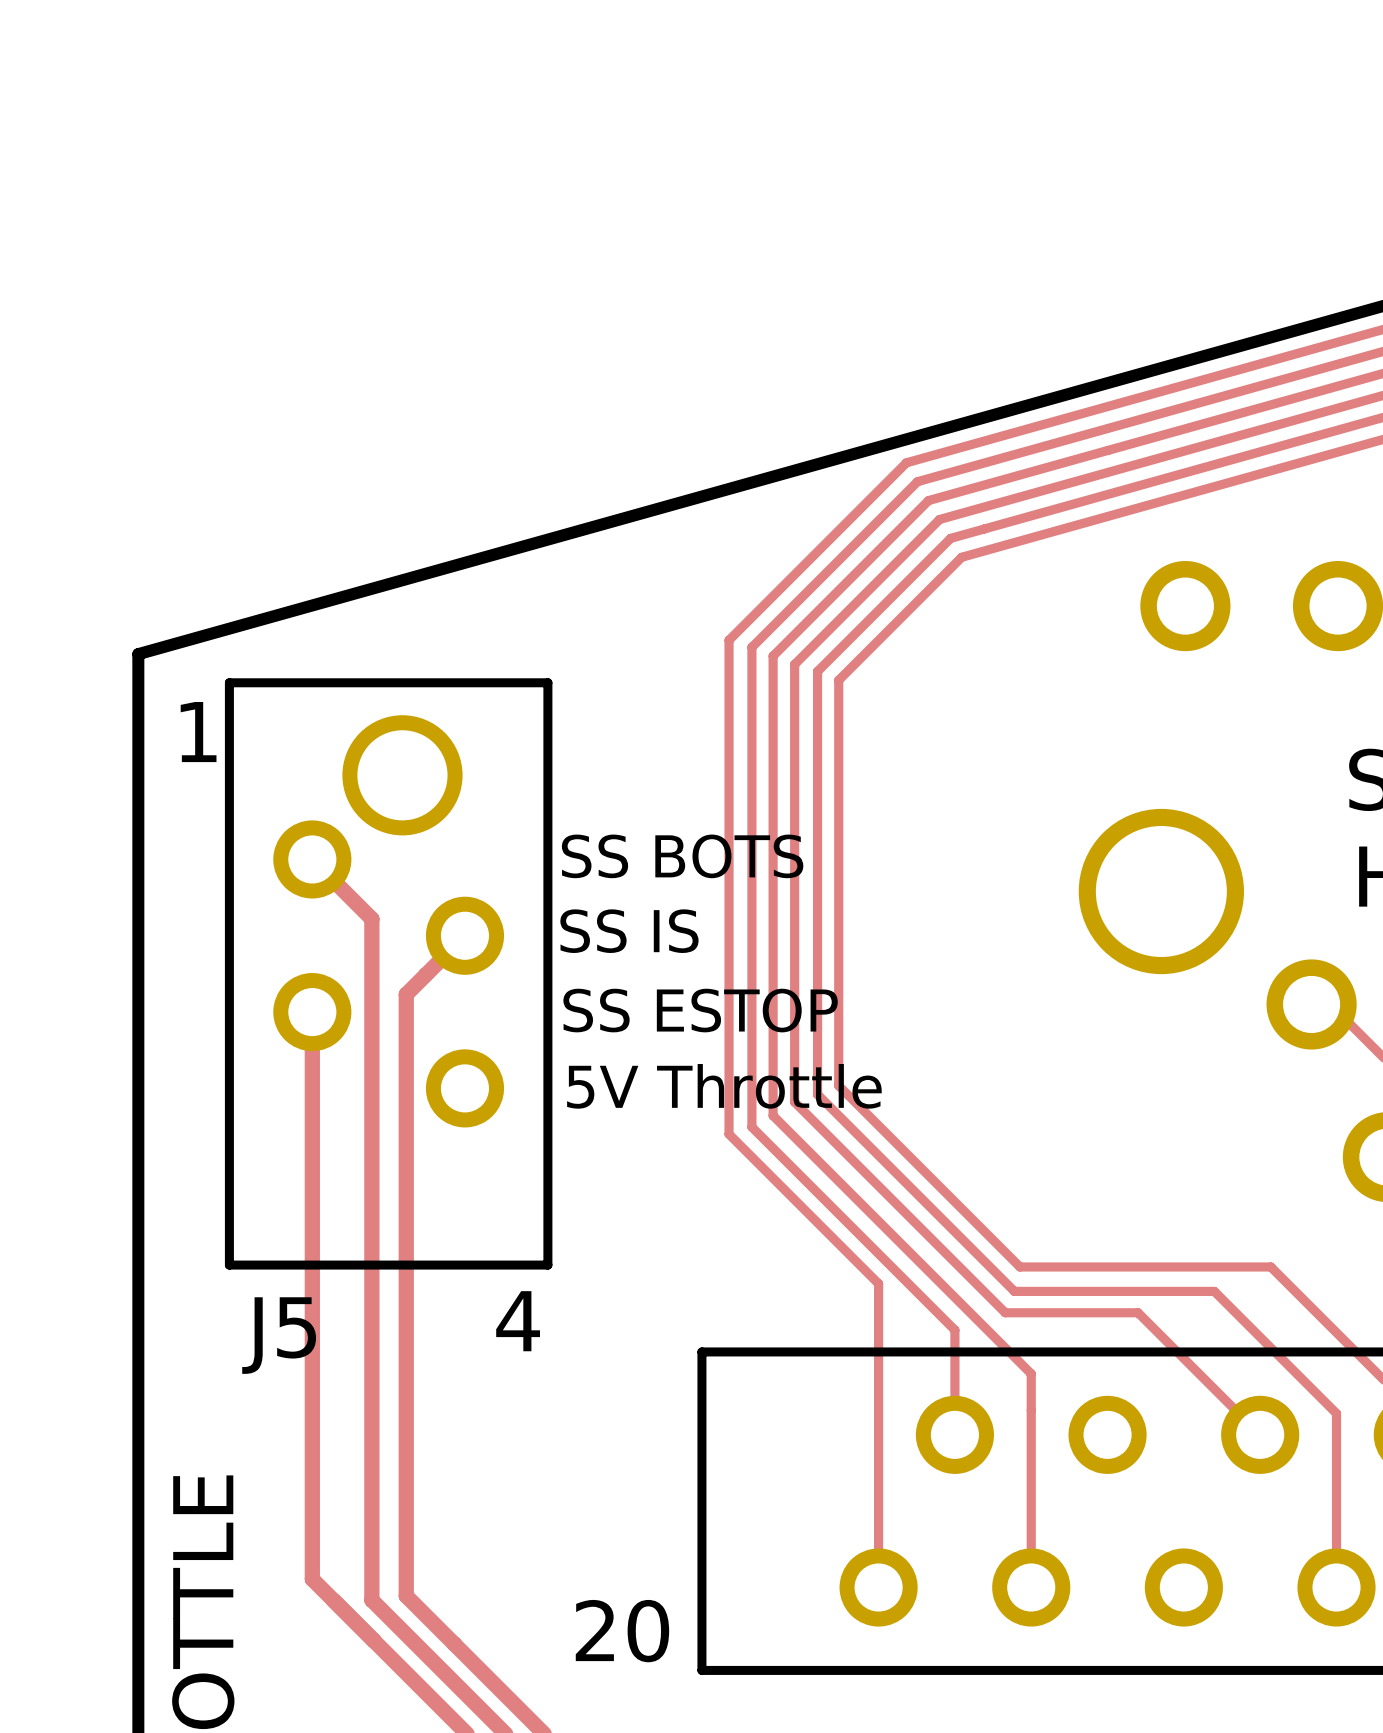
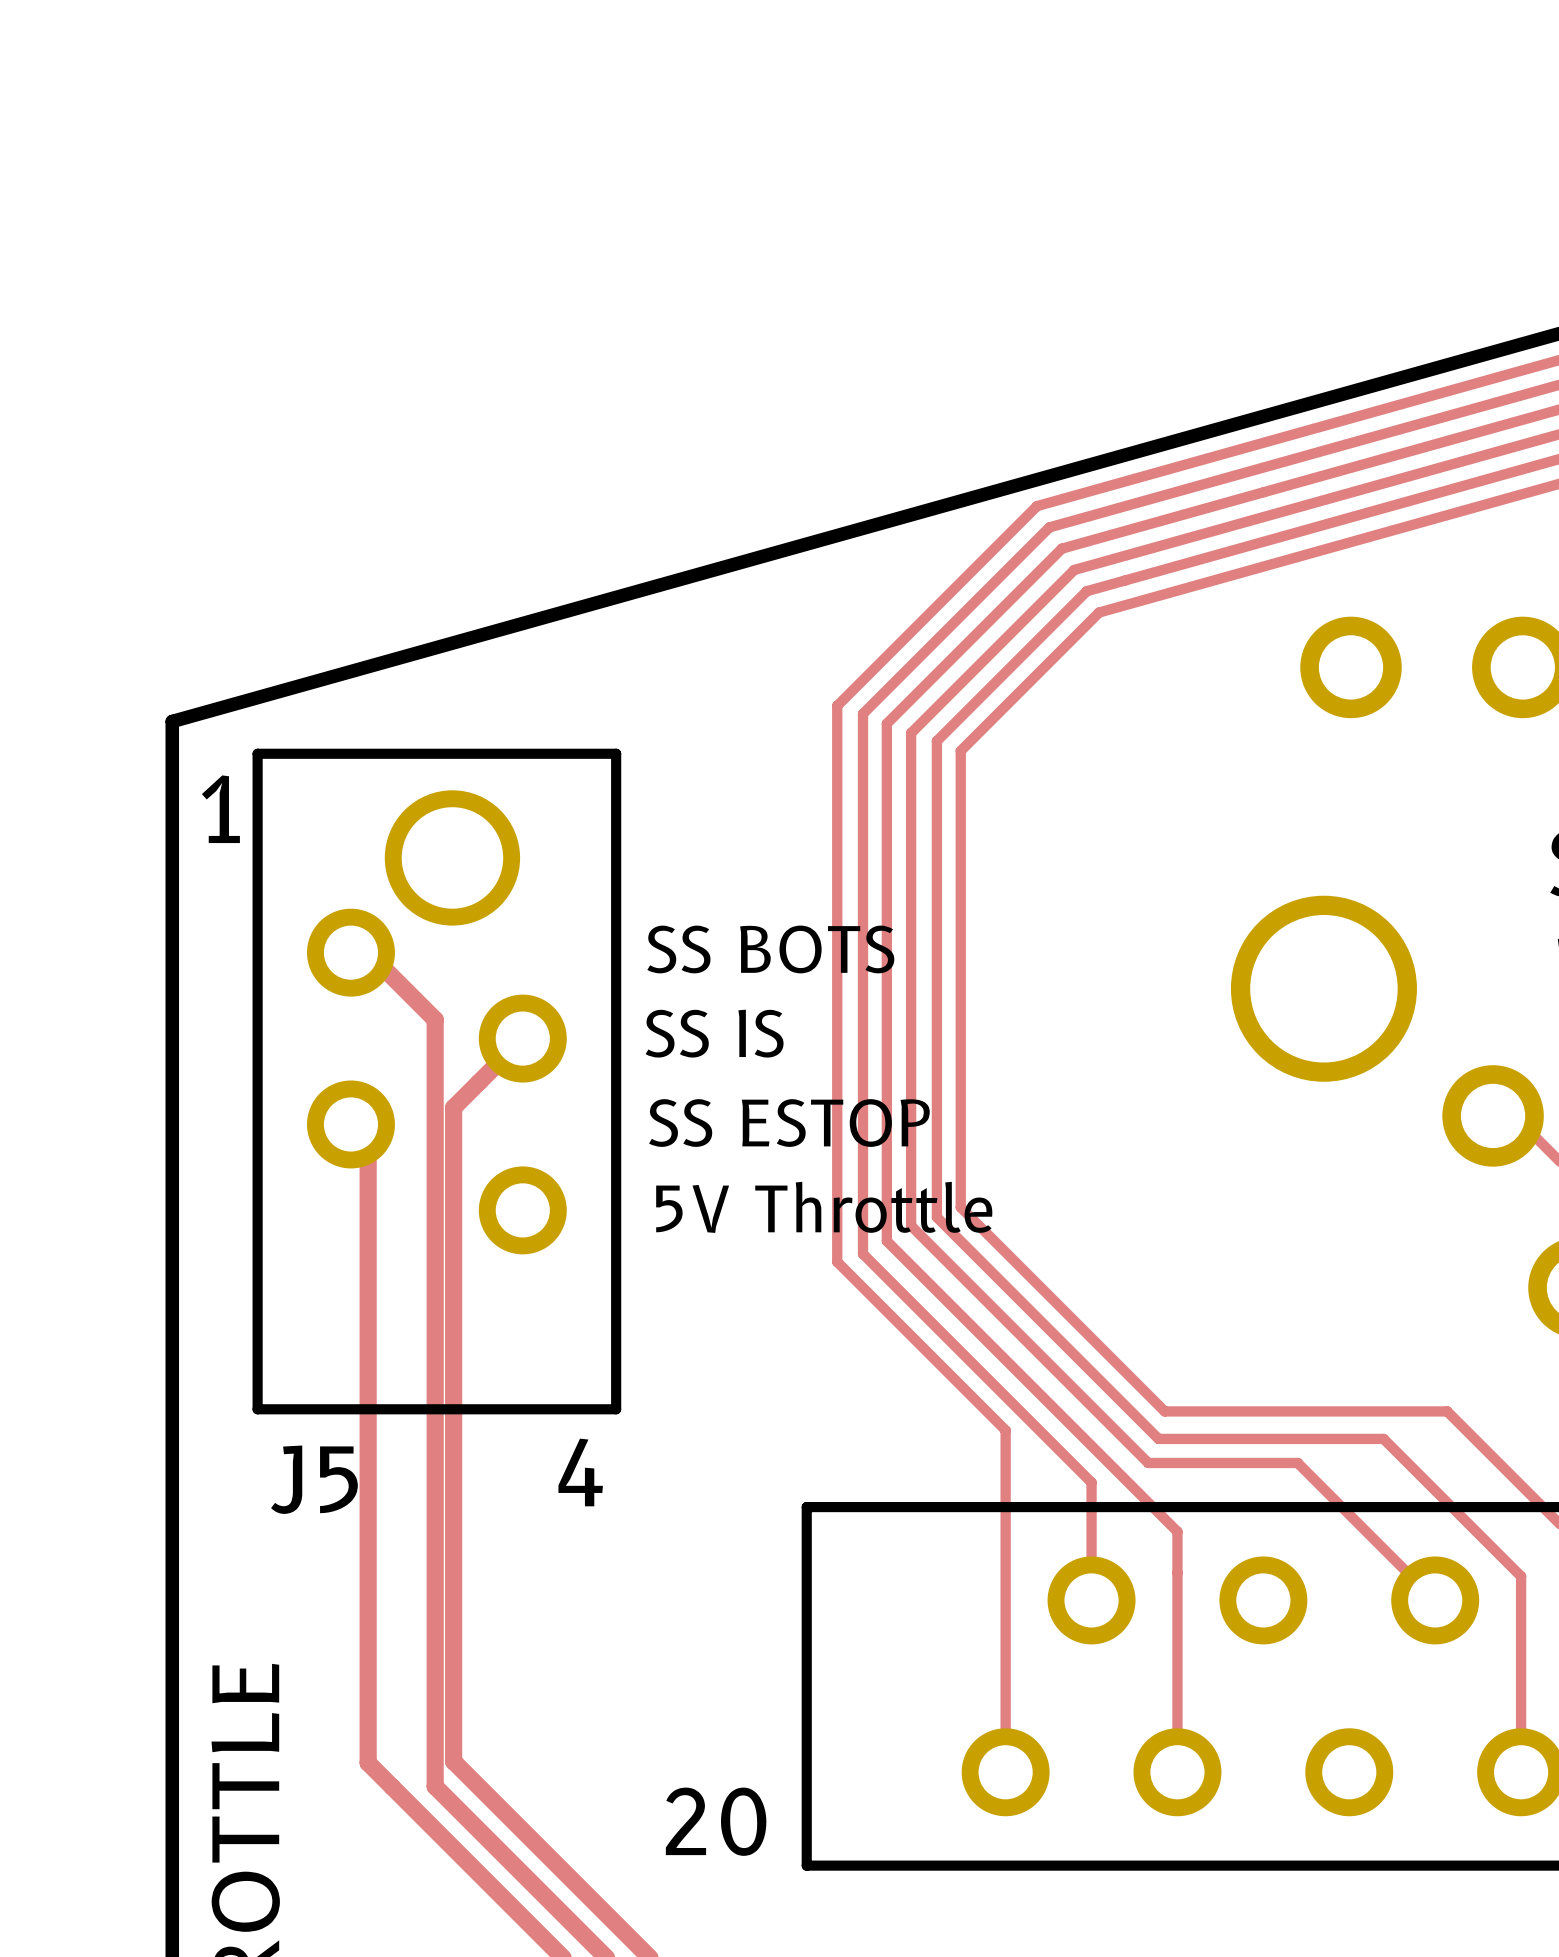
track: (464, 935) (406, 994) (406, 1595) -> (522, 1038) (453, 1107) (453, 1761) (473, 1781)
J5 position: (388, 973) -> (436, 1081)

